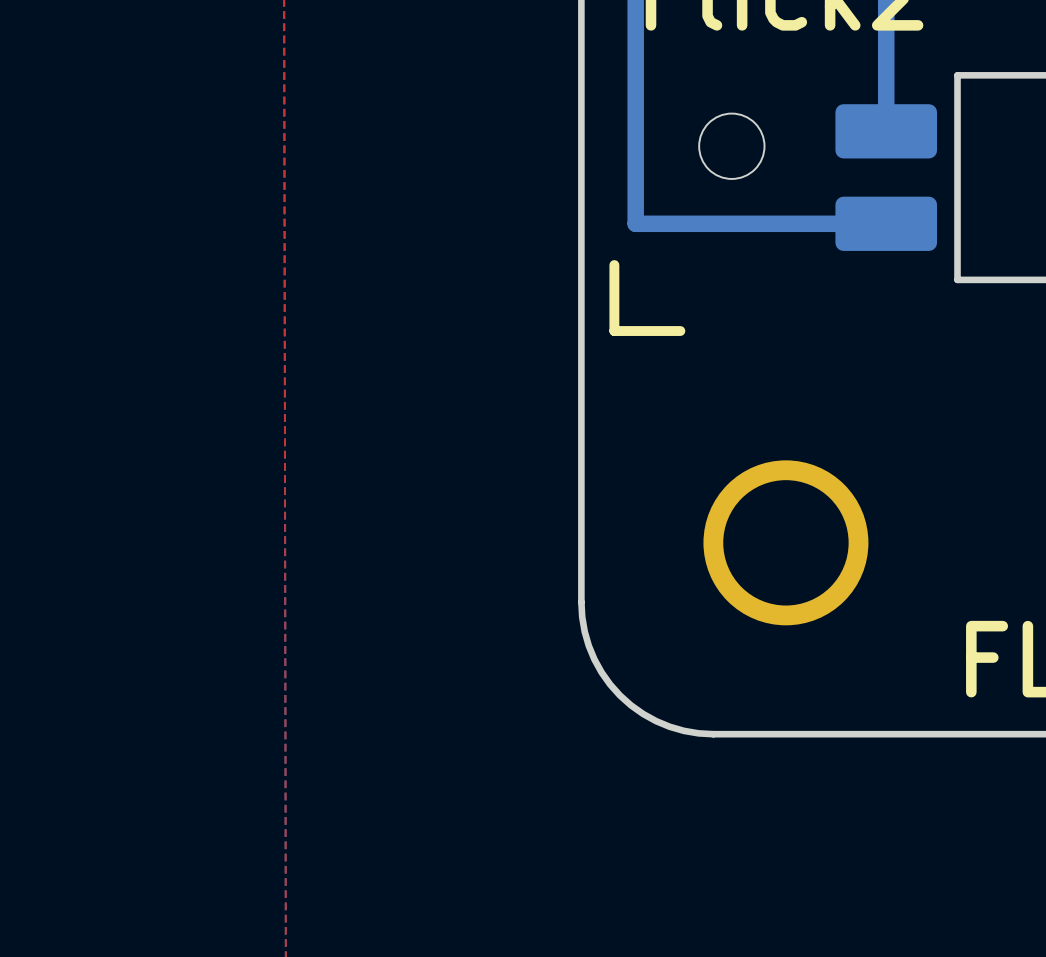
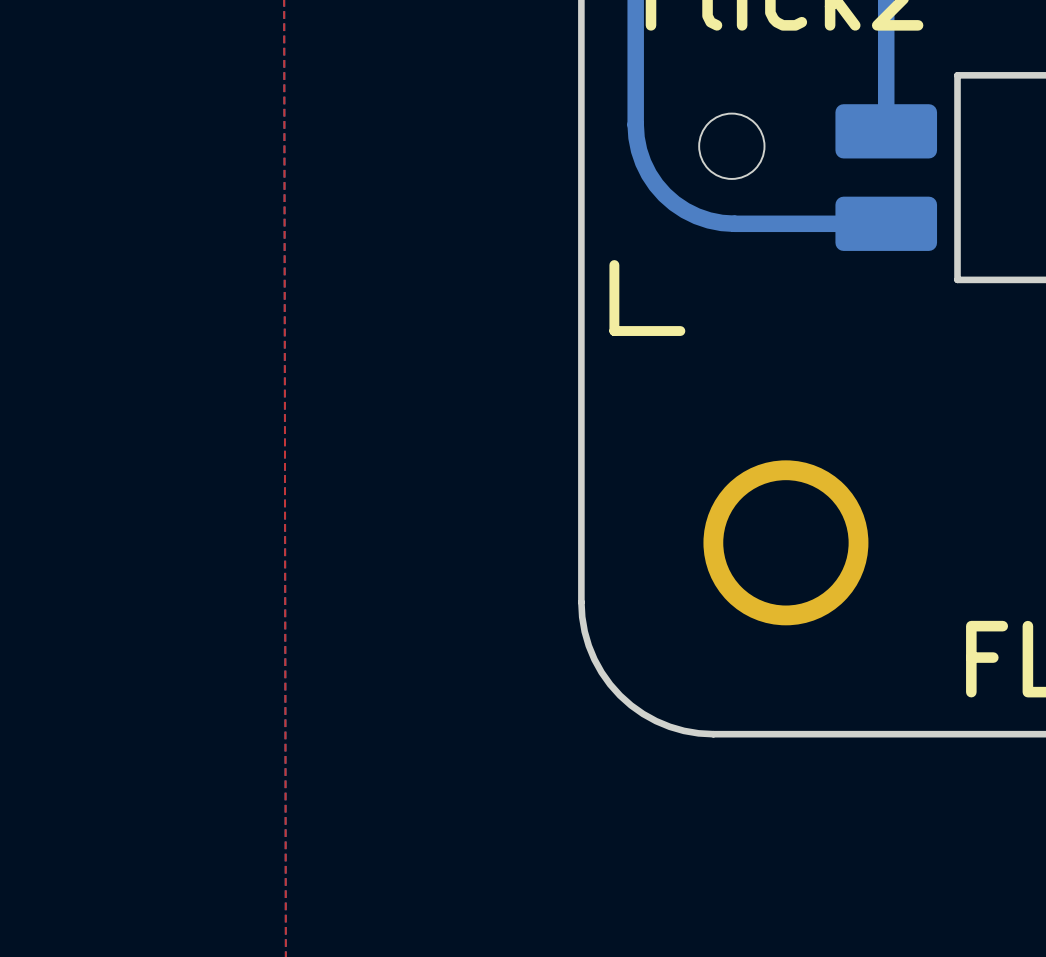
bottom track: (635, 124) (635, 223) (734, 223) -> (635, 124) (639, 150) (643, 162) (648, 174) (664, 194) (674, 203) (696, 216) (709, 220) (734, 223)

